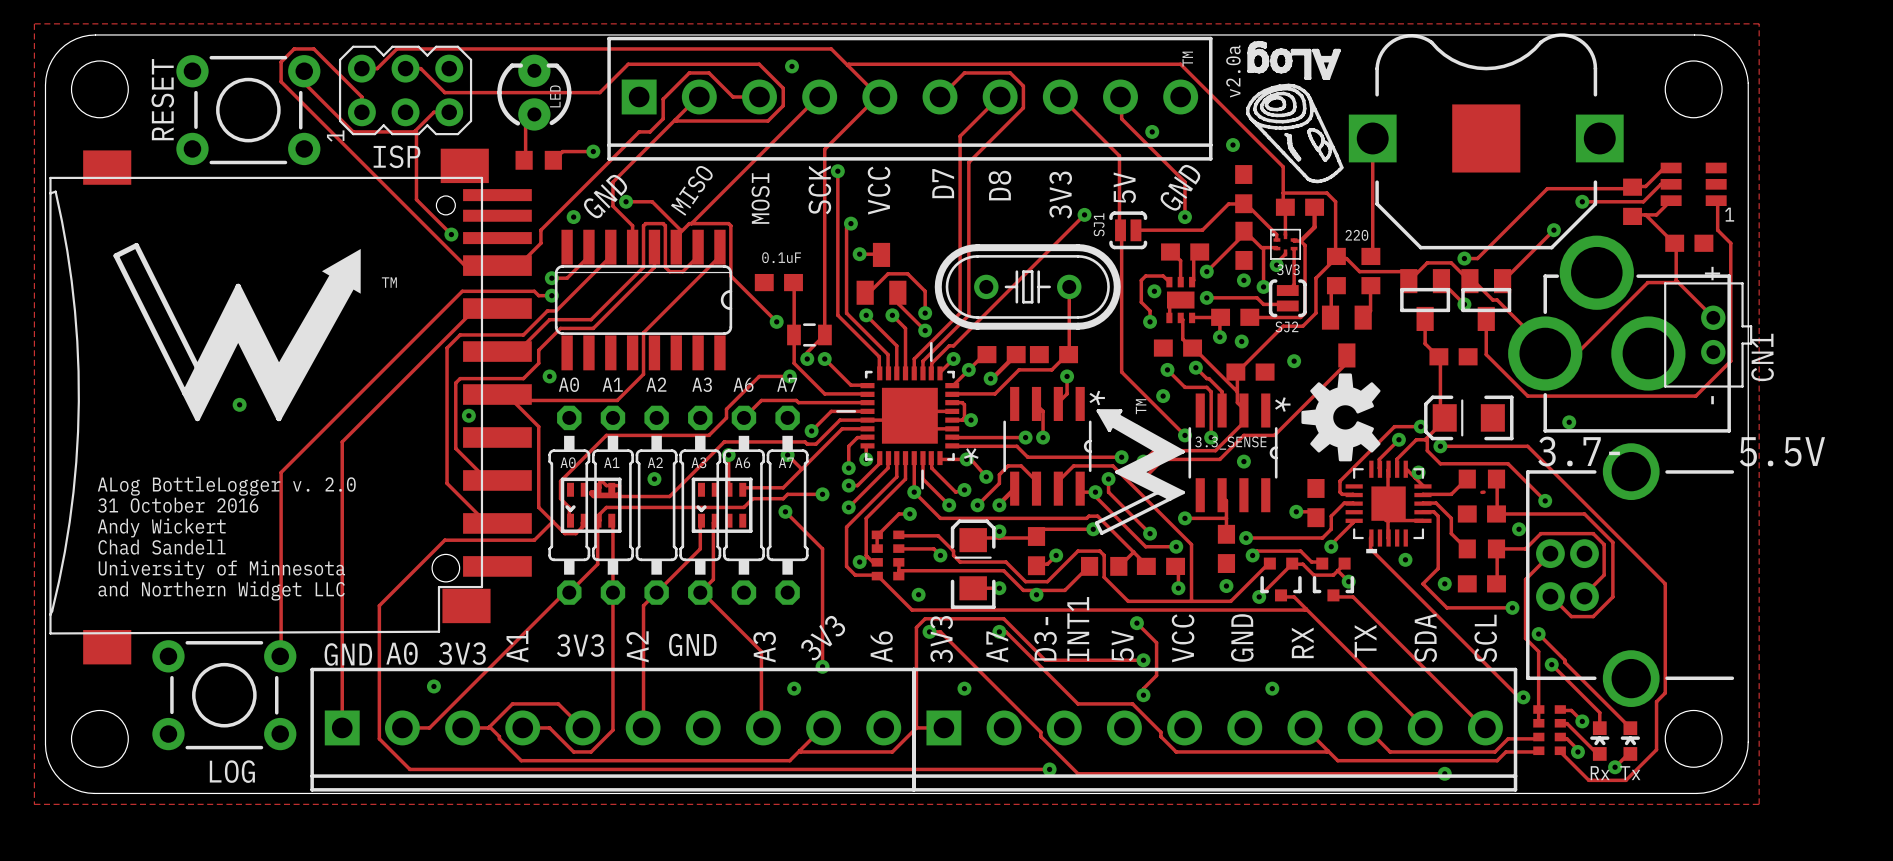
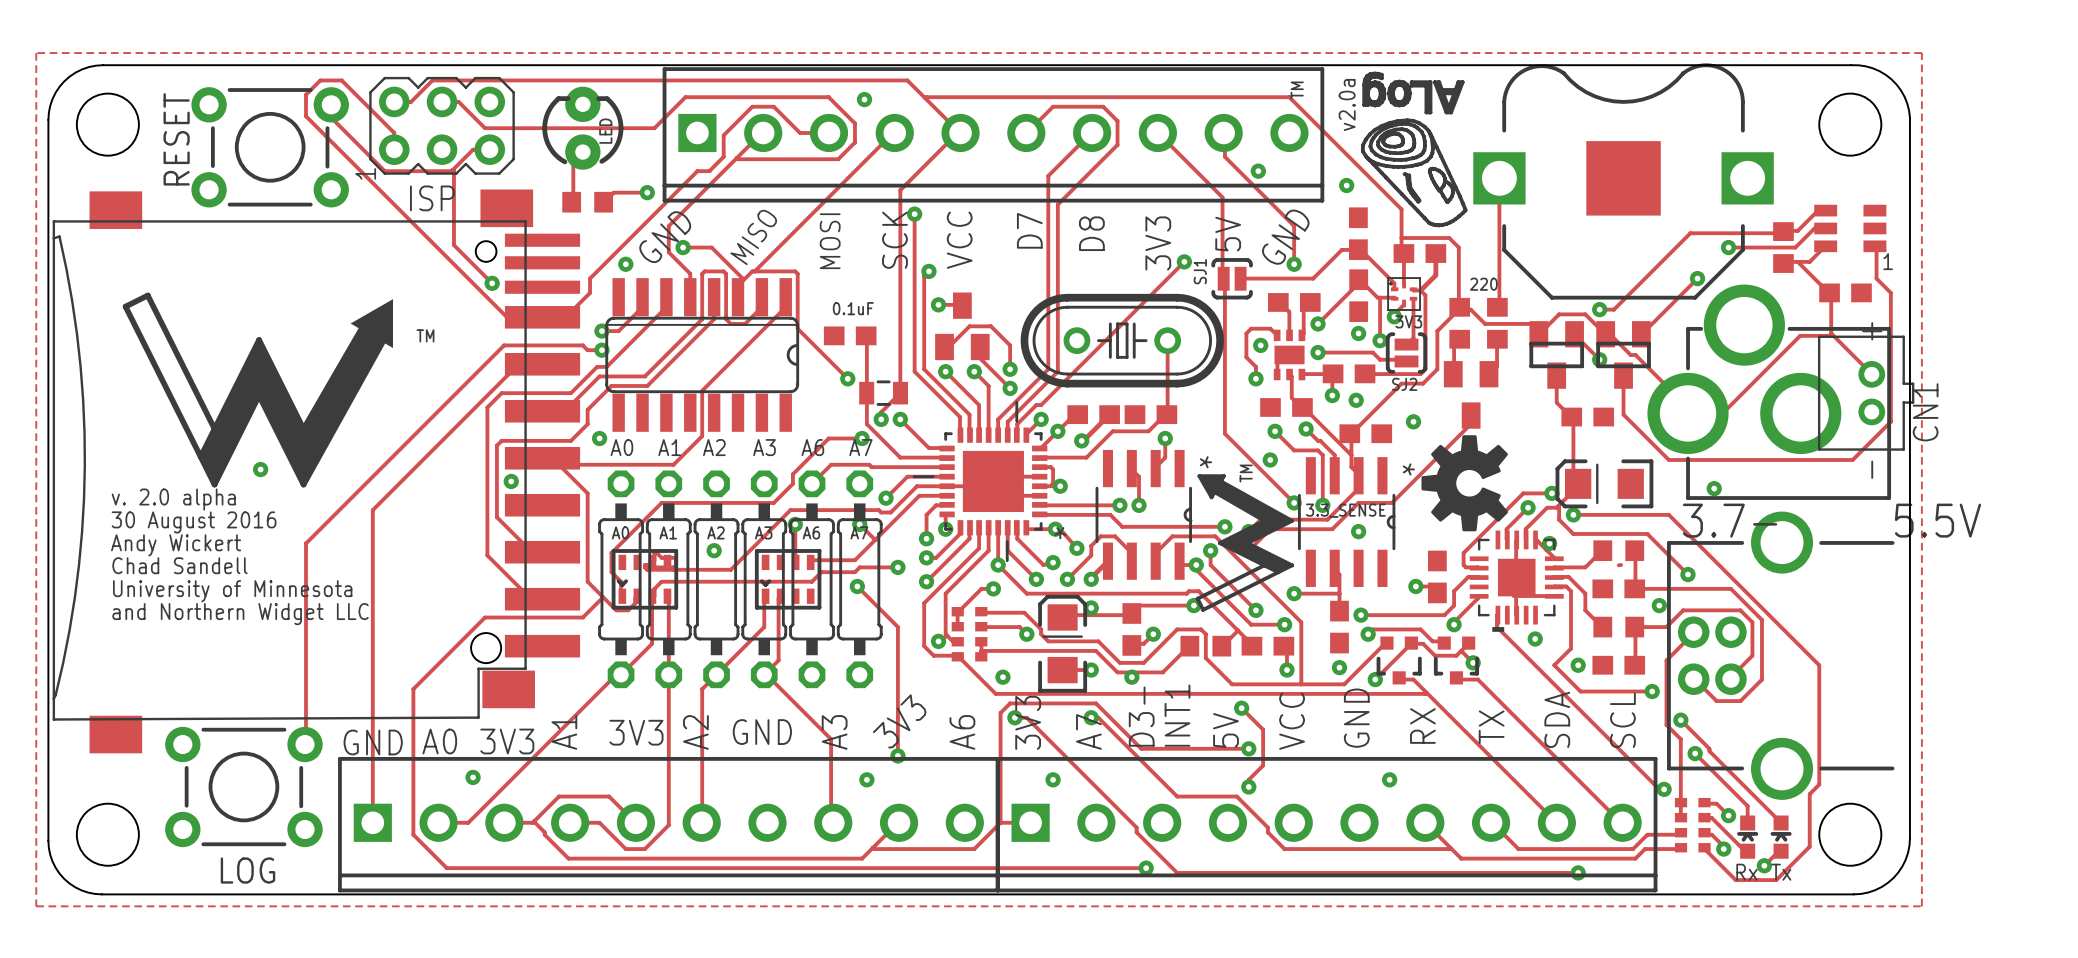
text: none -> v. 2.0 alpha (173, 499)
text: none -> 30 August 2016 (194, 522)
text: ALog BottleLogger v. 2.0 (226, 486) -> none
text: 31 October 2016 (178, 505) -> none
text position: Andy Wickert (161, 527) -> Andy Wickert (176, 545)
text position: Chad Sandell (162, 547) -> Chad Sandell (179, 565)
text position: University of Minnesota (221, 569) -> University of Minnesota (232, 591)
text position: and Northern Widget LLC (221, 590) -> and Northern Widget LLC (240, 614)

